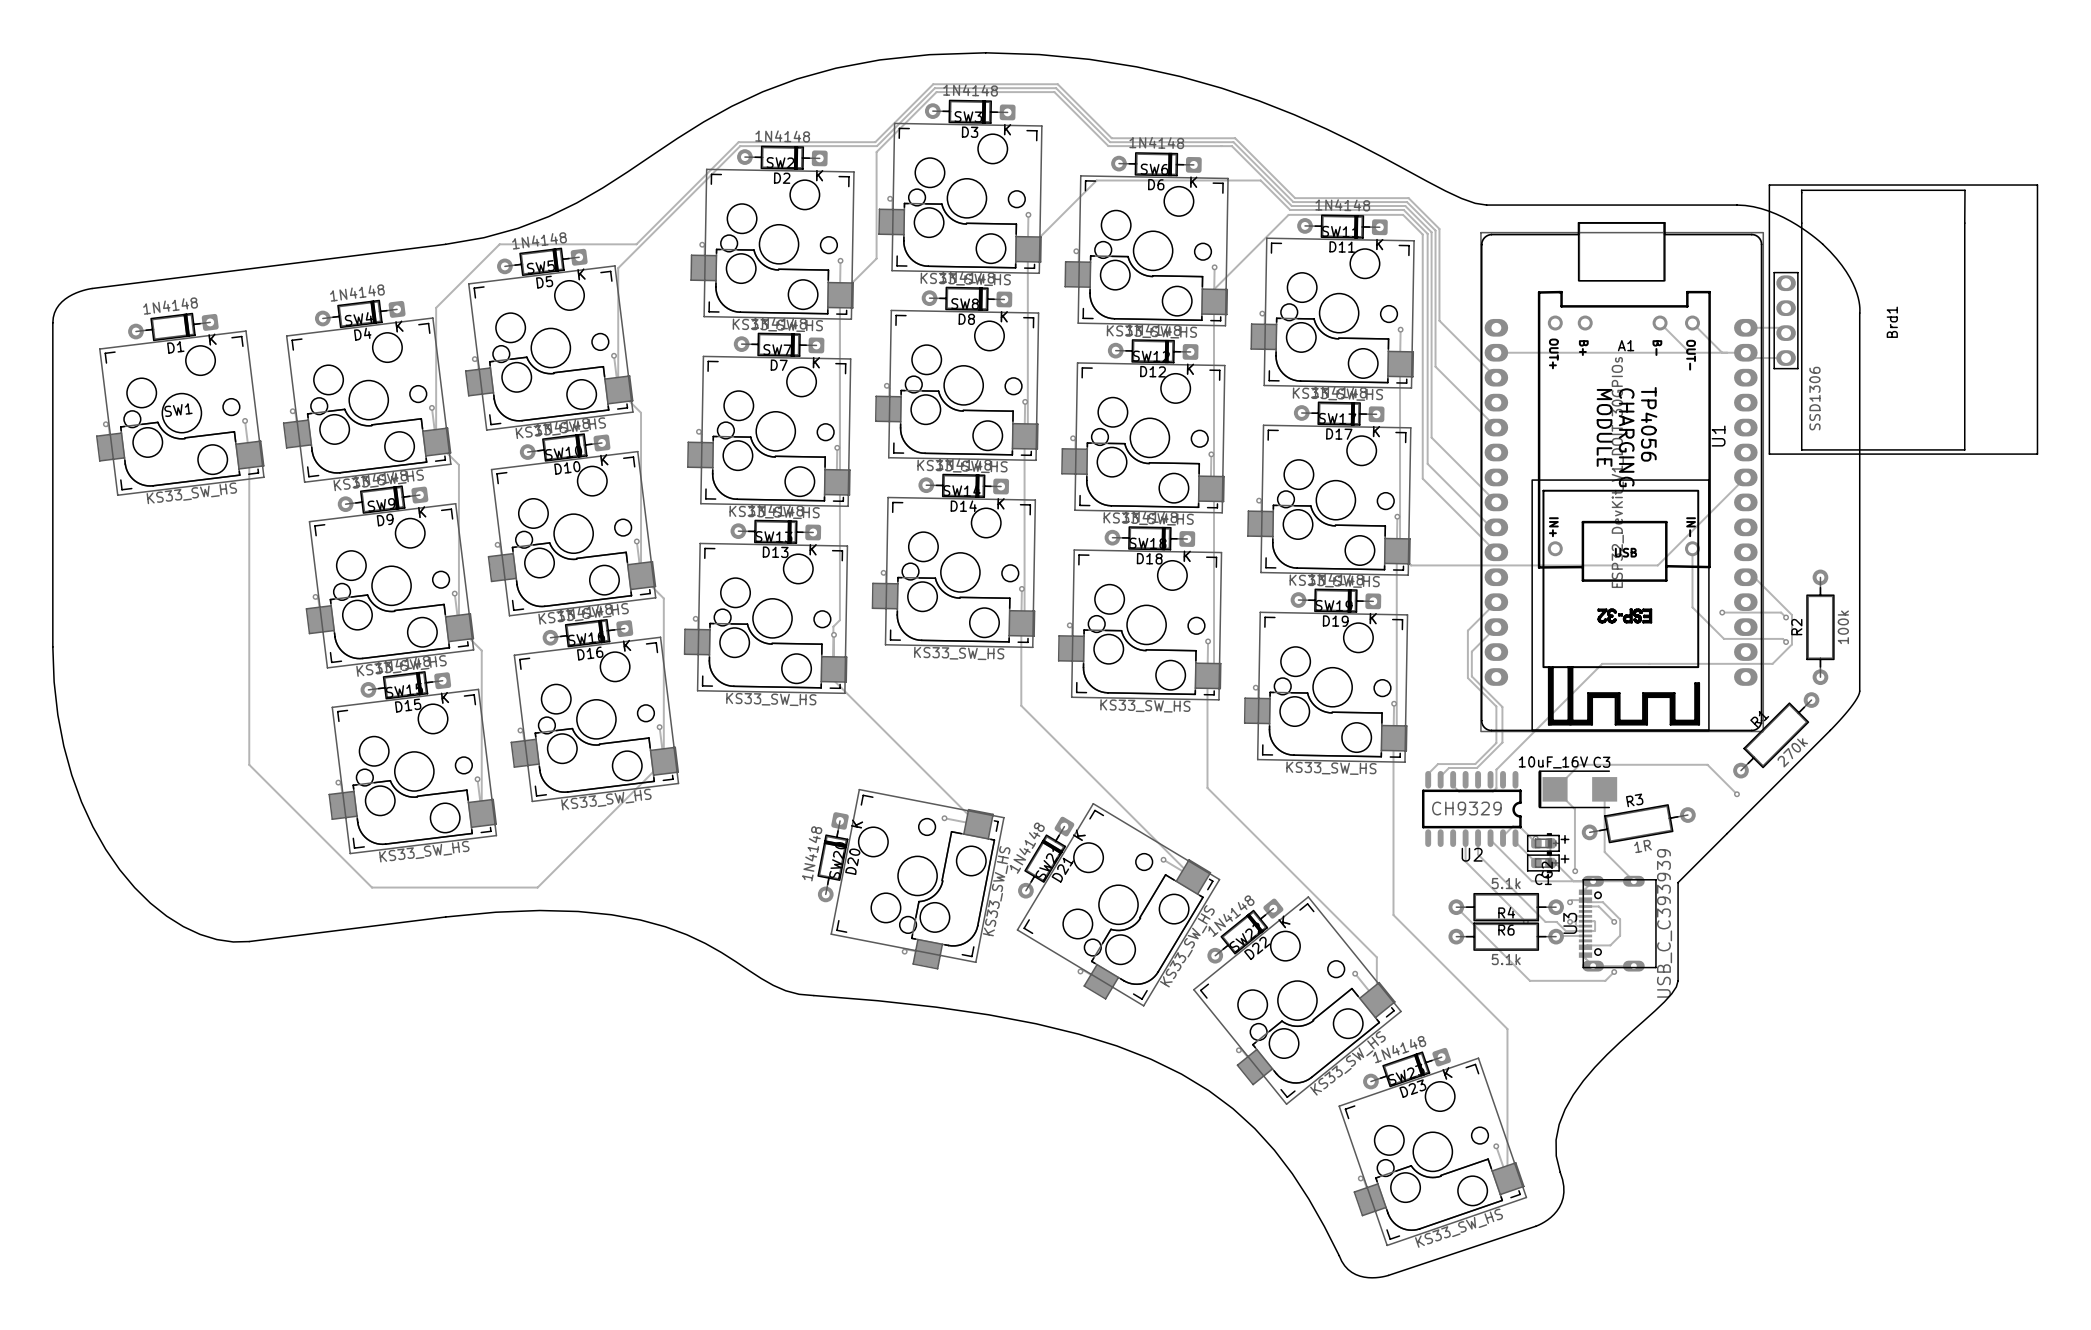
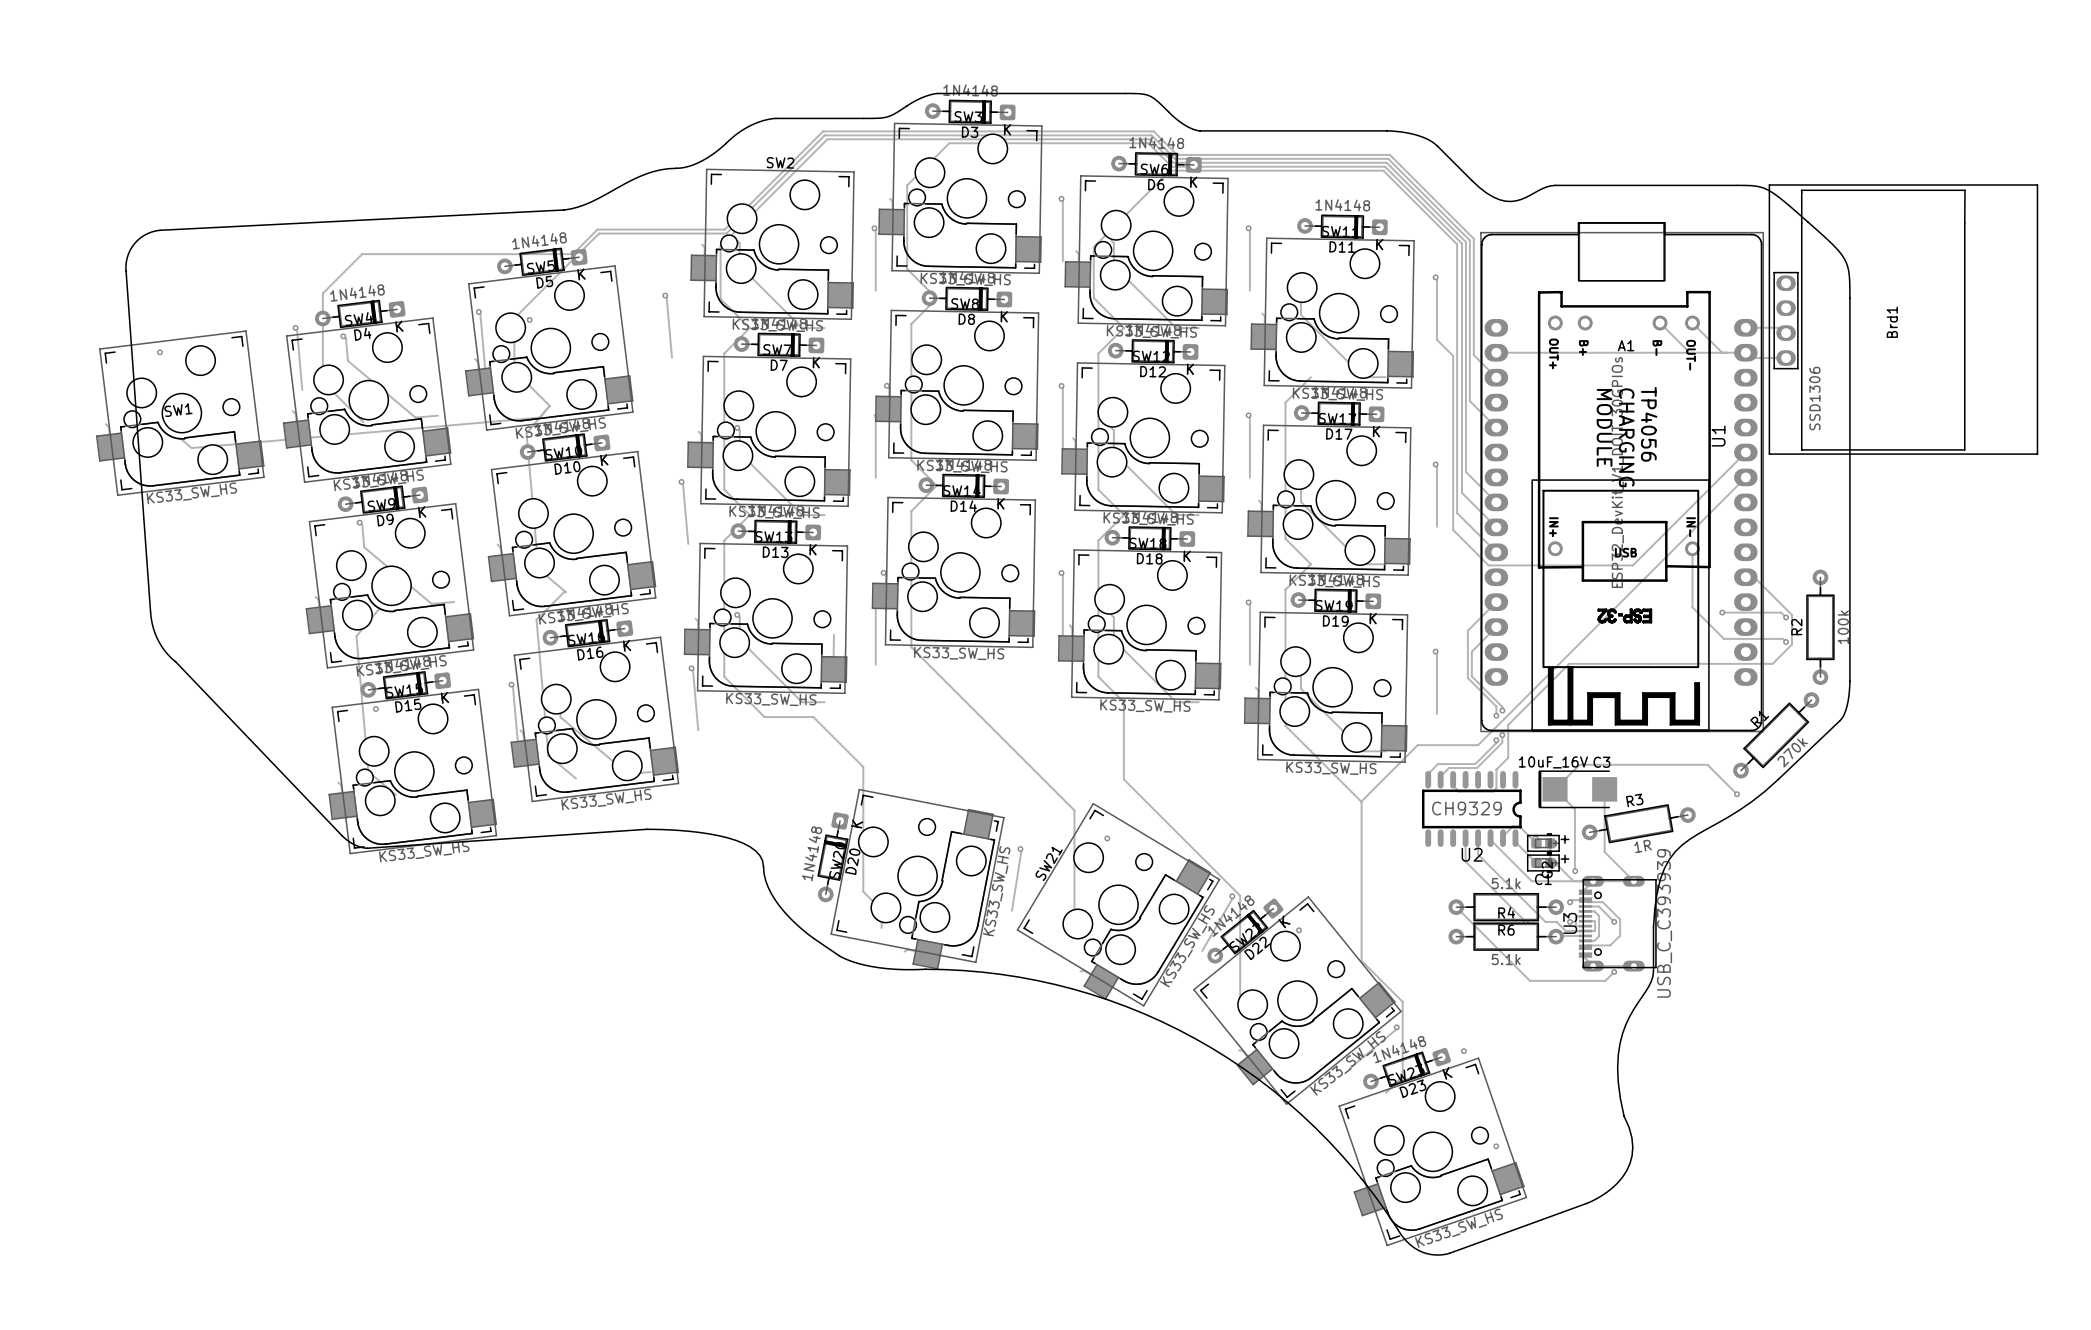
board edge: (985, 52) (929, 54) (879, 59) (835, 68) (797, 78) (762, 91) (703, 121) (576, 202) (518, 228) (483, 237) (445, 244) (91, 288) (76, 292) (61, 301) (54, 312) (52, 322) (54, 681) (63, 746) (71, 775) (92, 826) (119, 869) (150, 903) (183, 926) (216, 939) (249, 941) (495, 912) (539, 910) (611, 914) (640, 919) (686, 934) (721, 952) (773, 985) (799, 994) (877, 1000) (988, 1014) (1036, 1023) (1116, 1045) (1181, 1074) (1208, 1090) (1254, 1128) (1292, 1173) (1308, 1199) (1344, 1265) (1359, 1276) (1372, 1277) (1387, 1275) (1539, 1224) (1553, 1214) (1563, 1197) (1563, 1186) (1556, 1155) (1556, 1139) (1559, 1124) (1573, 1094) (1594, 1067) (1664, 1001) (1676, 986) (1678, 980) (1678, 882) (1832, 727) (1850, 707) (1859, 693) (1859, 310) (1852, 283) (1836, 258) (1815, 238) (1790, 221) (1761, 208) (1736, 205) (1486, 205) (1475, 203) (1445, 191) (1326, 128) (1259, 100) (1221, 88) (1136, 66) (1089, 59) (1039, 54) (985, 52) -> (938, 93) (919, 98) (893, 114) (883, 117) (775, 118) (760, 121) (739, 131) (716, 151) (698, 162) (685, 167) (660, 169) (645, 174) (591, 201) (571, 208) (160, 230) (140, 237) (128, 254) (126, 270) (150, 611) (153, 628) (161, 646) (342, 835) (357, 846) (367, 848) (646, 829) (689, 831) (727, 837) (750, 846) (759, 855) (768, 887) (775, 899) (788, 916) (811, 936) (846, 959) (886, 968) (981, 972) (1055, 984) (1127, 1006) (1161, 1021) (1211, 1047) (1273, 1090) (1315, 1127) (1365, 1183) (1405, 1240) (1423, 1252) (1435, 1254) (1449, 1253) (1586, 1203) (1601, 1195) (1622, 1177) (1632, 1155) (1631, 1137) (1620, 1098) (1618, 1055) (1625, 1024) (1652, 976) (1654, 908) (1664, 868) (1669, 859) (1682, 845) (1739, 810) (1764, 791) (1840, 720) (1846, 707) (1849, 681) (1849, 291) (1848, 270) (1844, 259) (1832, 244) (1788, 205) (1771, 191) (1758, 186) (1555, 185) (1546, 187) (1520, 199) (1505, 201) (1493, 197) (1479, 187) (1434, 143) (1423, 137) (1406, 132) (1387, 130) (1198, 130) (1181, 123) (1153, 98) (1139, 93) (938, 93)
D2: 1N4148 (782, 157) -> none
via: (890, 198) -> none
track: none -> (1061, 198) (1062, 261)
via: none -> (1061, 198)
track: (1028, 214) (1027, 249) -> none
via: (1028, 214) -> none
track: none -> (874, 228) (875, 290)
via: none -> (874, 228)
track: none -> (1248, 228) (1249, 290)
via: none -> (1248, 228)
track: none -> (737, 240) (739, 243) (739, 265) (802, 328) (824, 328)
track: none -> (1111, 240) (1113, 243) (1113, 265) (1176, 328) (1198, 328)
via: (702, 244) -> none
track: (1027, 249) (1096, 180) (1260, 180) (1290, 209) (1403, 209) (1427, 233) (1427, 463) (1491, 527) (1496, 527) -> (1074, 920) (1074, 810) (911, 647) (911, 511) (936, 485) (911, 460) (911, 324) (936, 298) (907, 268) (907, 185) (949, 143) (1148, 143) (1171, 166) (1385, 166) (1462, 243) (1462, 492) (1496, 527)
track: (1027, 249) (1027, 433) (1024, 436) -> none
via: (1076, 251) -> none
track: (840, 260) (839, 295) -> none
via: (840, 260) -> none
track: (1214, 267) (1214, 301) -> none
via: (1214, 267) -> none
via: none -> (1435, 277)
track: none -> (1298, 289) (1300, 292) (1300, 314) (1363, 377) (1385, 377)
track: none -> (665, 295) (671, 357)
via: none -> (665, 295)
track: (839, 295) (876, 258) (876, 152) (936, 92) (1054, 92) (1108, 146) (1231, 146) (1291, 206) (1405, 206) (1431, 232) (1431, 437) (1465, 471) -> (881, 928) (881, 910) (863, 891) (863, 766) (813, 717) (764, 717) (724, 676) (724, 540) (749, 515) (724, 489) (724, 353) (749, 328) (720, 298) (720, 246) (827, 139) (1149, 139) (1173, 162) (1386, 162) (1465, 242) (1465, 471)
track: (839, 295) (839, 620) (833, 626) (833, 679) (978, 824) (944, 818) -> none
track: none -> (478, 311) (485, 373)
via: none -> (478, 311)
via: (1262, 313) -> none
via: none -> (529, 319)
D1: 1N4148 (173, 326) -> none
track: none -> (295, 327) (302, 389)
via: none -> (295, 327)
track: (1400, 329) (1400, 547) (1396, 551) -> none
via: (1400, 329) -> none
track: none -> (343, 336) (345, 338) (347, 360) (415, 417) (437, 415)
via: none -> (343, 336)
via: none -> (159, 352)
track: (614, 355) (618, 389) -> none
via: (614, 355) -> none
track: (1473, 355) (1439, 320) (1439, 228) (1408, 198) (1295, 198) (1235, 138) (1111, 138) (1057, 84) (933, 84) (875, 142) (738, 142) (636, 244) (499, 244) (436, 307) (436, 442) -> (1473, 355) (1473, 238) (1389, 154) (1177, 154) (1153, 131) (823, 131) (724, 229) (597, 229) (572, 254) (362, 254) (322, 293) (322, 381) (363, 422)
via: (474, 359) -> none
track: none -> (1310, 377) (1285, 402) (1285, 538) (1310, 564) (1285, 589) (1285, 725) (1361, 801)
track: none -> (1061, 385) (1062, 448)
via: none -> (1061, 385)
track: (618, 389) (618, 268) (740, 146) (876, 146) (934, 88) (1056, 88) (1110, 142) (1233, 142) (1293, 202) (1407, 202) (1435, 230) (1435, 366) (1469, 401) -> (575, 778) (548, 755) (536, 619) (565, 592) (538, 569) (526, 433) (549, 405) (514, 370) (514, 318) (599, 233) (726, 233) (824, 135) (1151, 135) (1175, 158) (1388, 158) (1469, 240) (1469, 401)
track: (618, 389) (641, 412) (641, 575) -> none
track: (1025, 401) (1024, 436) -> none
via: (1025, 401) -> none
track: (431, 407) (436, 442) -> none
via: (431, 407) -> none
via: (292, 411) -> none
track: none -> (874, 415) (875, 477)
track: none -> (1248, 415) (1249, 477)
via: none -> (1248, 415)
track: none -> (539, 417) (191, 448) (180, 438)
track: (245, 420) (249, 455) (249, 764) (371, 887) (537, 887) (663, 761) -> none
via: (245, 420) -> none
via: (105, 424) -> none
track: none -> (737, 427) (739, 430) (739, 452) (802, 515) (824, 515)
via: none -> (737, 427)
track: none -> (1111, 427) (1113, 430) (1113, 452) (1176, 515) (1198, 515)
via: (698, 431) -> none
track: (1024, 436) (1024, 620) (1021, 623) -> none
via: (1073, 438) -> none
track: (436, 442) (458, 464) (458, 627) -> none
track: (837, 447) (836, 482) (839, 479) -> none
via: (837, 447) -> none
track: (1211, 454) (1210, 488) (1214, 485) -> none
via: (1211, 454) -> none
track: none -> (1435, 464) (1436, 526)
via: none -> (1435, 464)
track: none -> (1298, 476) (1300, 479) (1300, 501) (1363, 564) (1385, 564)
track: none -> (681, 481) (688, 543)
via: none -> (681, 481)
via: (1259, 500) -> none
track: (1457, 513) (1422, 478) (1422, 234) (1403, 214) (1288, 214) (1214, 289) (1214, 669) (1207, 675) -> (1457, 513) (1457, 244) (1383, 170) (1170, 170) (1093, 247) (1093, 297) (1123, 328) (1098, 353) (1098, 489) (1123, 515) (1098, 540) (1098, 676) (1123, 702) (1123, 779) (1240, 895) (1240, 995)
track: (1397, 516) (1396, 551) -> none
via: (1397, 516) -> none
track: none -> (359, 522) (362, 524) (364, 547) (431, 603) (454, 602)
via: none -> (359, 522)
track: (636, 541) (641, 575) -> none
via: (636, 541) -> none
via: (497, 544) -> none
track: (1396, 551) (1411, 565) (1488, 565) -> (1435, 277) (1436, 339) (1453, 355) (1453, 530) (1488, 565)
track: (1396, 551) (1396, 734) (1393, 738) -> none
track: (1632, 565) (1657, 565) -> (1632, 565) (1745, 452)
track: none -> (1657, 565) (1478, 745) (1417, 745) (1361, 801) (1361, 960) (1402, 1001) (1402, 1076) (1386, 1092)
track: none -> (1061, 572) (1062, 635)
via: none -> (1061, 572)
track: (641, 575) (663, 598) (663, 761) -> none
track: (1021, 588) (1021, 623) -> none
via: (1021, 588) -> none
track: (454, 593) (458, 627) -> none
via: (454, 593) -> none
via: (315, 596) -> none
track: none -> (874, 602) (875, 664)
track: none -> (1248, 602) (1249, 664)
via: none -> (1248, 602)
track: none -> (379, 608) (356, 636) (368, 771) (395, 794)
track: none -> (737, 614) (739, 617) (739, 639) (802, 702) (824, 702)
via: none -> (737, 614)
track: none -> (1111, 614) (1113, 617) (1113, 639) (1176, 702) (1198, 702)
via: (695, 618) -> none
track: (1021, 623) (1021, 705) (1193, 877) (1163, 859) -> none
via: (1069, 625) -> none
track: (458, 627) (481, 650) (481, 813) (477, 779) -> none
via: (834, 634) -> none
track: (1208, 641) (1207, 675) -> none
via: (1208, 641) -> none
track: none -> (1435, 651) (1436, 713)
via: none -> (1435, 651)
track: (1602, 663) (1508, 757) -> (1602, 663) (1569, 663) (1508, 725) (1508, 757)
track: none -> (1298, 664) (1300, 666) (1300, 688) (1363, 751) (1385, 751)
track: none -> (691, 668) (698, 730)
via: none -> (691, 668)
track: (1207, 675) (1207, 787) (1376, 957) (1376, 1000) (1355, 973) -> none
track: none -> (511, 684) (518, 746)
via: none -> (511, 684)
via: (1255, 687) -> none
track: none -> (555, 692) (558, 694) (560, 717) (628, 774) (650, 772)
track: (1394, 703) (1393, 738) -> none
via: (1394, 703) -> none
via: none -> (375, 709)
track: (1502, 710) (1502, 742) -> (1502, 735) (1502, 742)
via: none -> (1502, 710)
track: (1496, 715) (1496, 740) -> none
via: none -> (1496, 715)
track: (659, 727) (663, 761) -> none
via: (659, 727) -> none
via: (520, 730) -> none
via: none -> (1502, 735)
track: (1393, 738) (1393, 915) (1507, 1029) (1507, 1178) (1496, 1146) -> none
via: none -> (1496, 740)
via: (477, 779) -> none
via: (338, 782) -> none
via: (944, 818) -> none
via: none -> (1107, 838)
track: none -> (1020, 849) (1011, 910)
via: none -> (1020, 849)
D21: 1N4148 (1046, 857) -> none
via: (1163, 859) -> none
track: none -> (1232, 896) (1202, 950)
via: none -> (1232, 896)
track: none -> (1585, 911) (1594, 911) (1599, 915) (1599, 936) (1594, 940) (1585, 940)
via: none -> (1299, 930)
via: (904, 951) -> none
via: (1080, 971) -> none
via: (1355, 973) -> none
track: none -> (1396, 1027) (1349, 1068)
via: none -> (1396, 1027)
via: (1238, 1050) -> none
via: none -> (1463, 1051)
via: (1360, 1178) -> none

